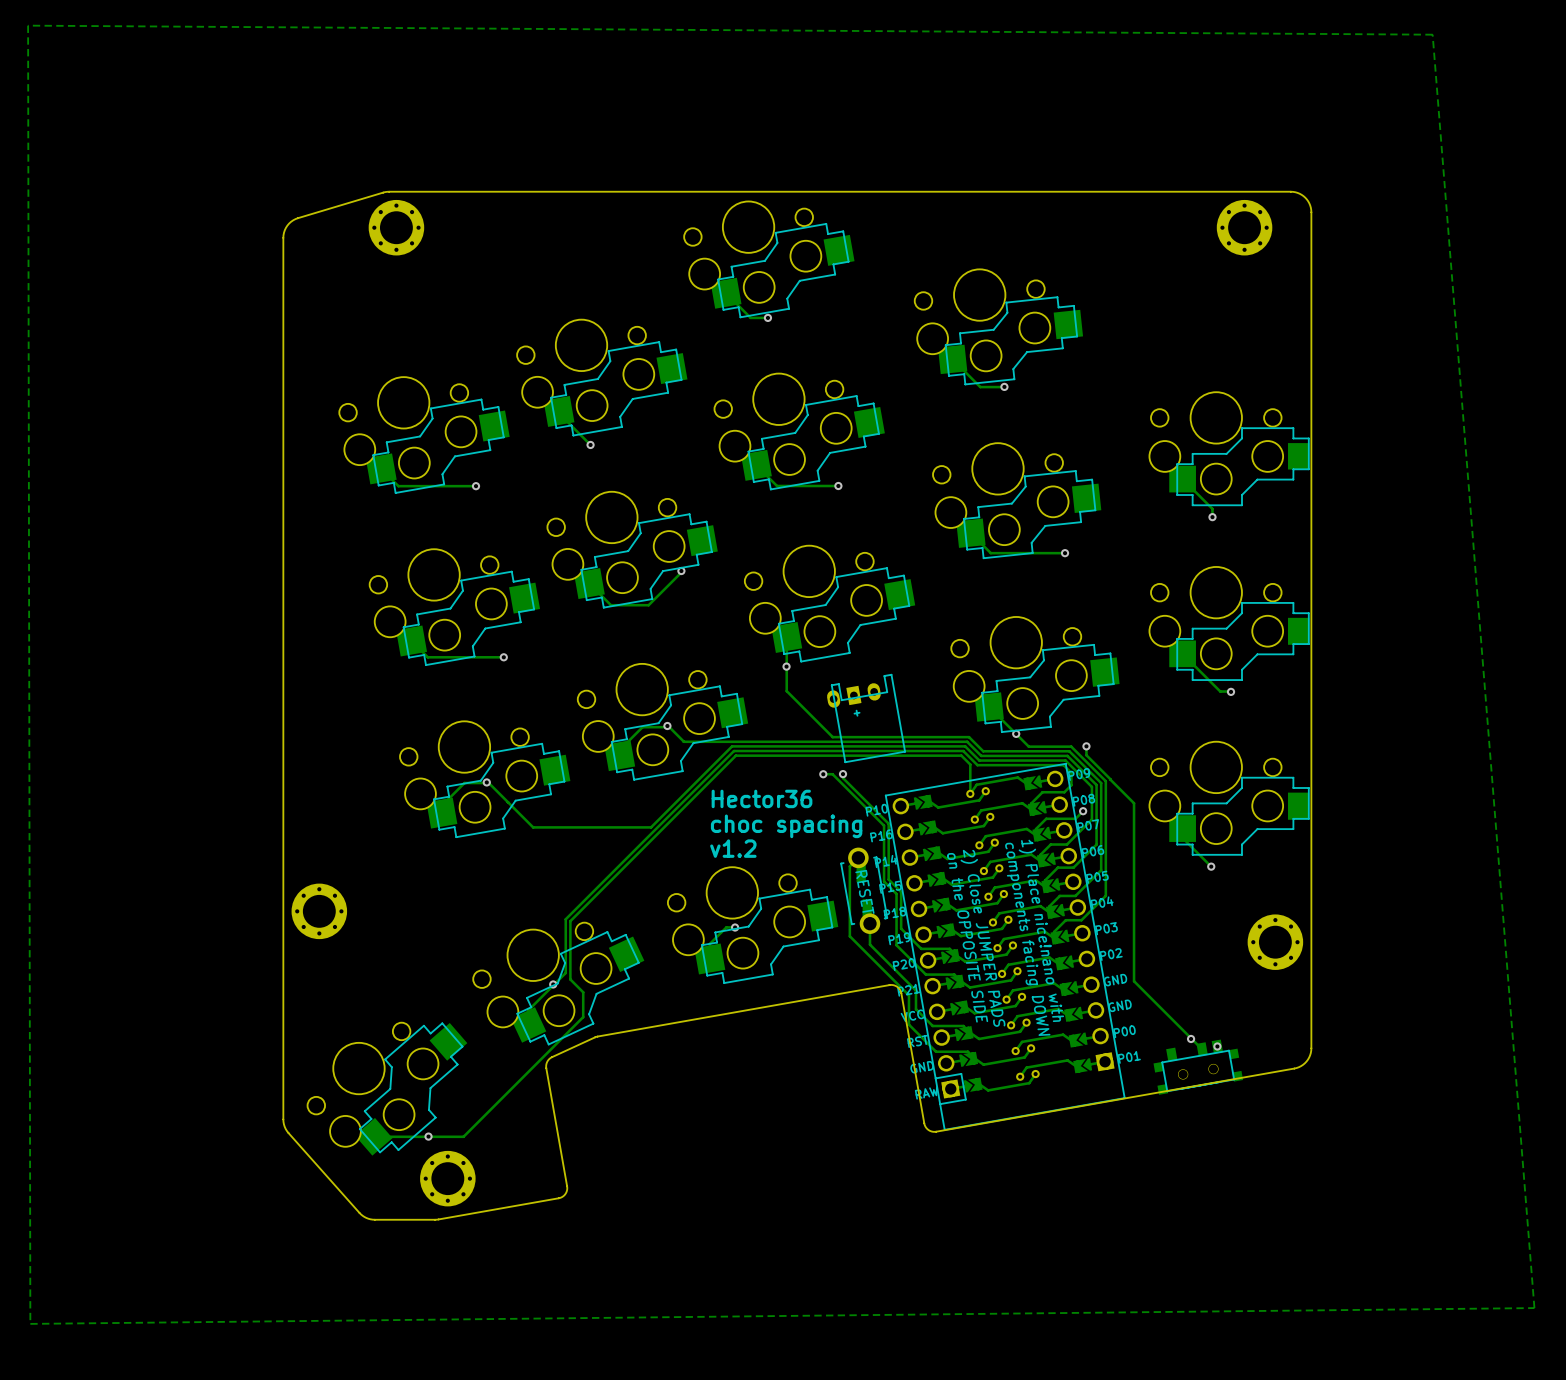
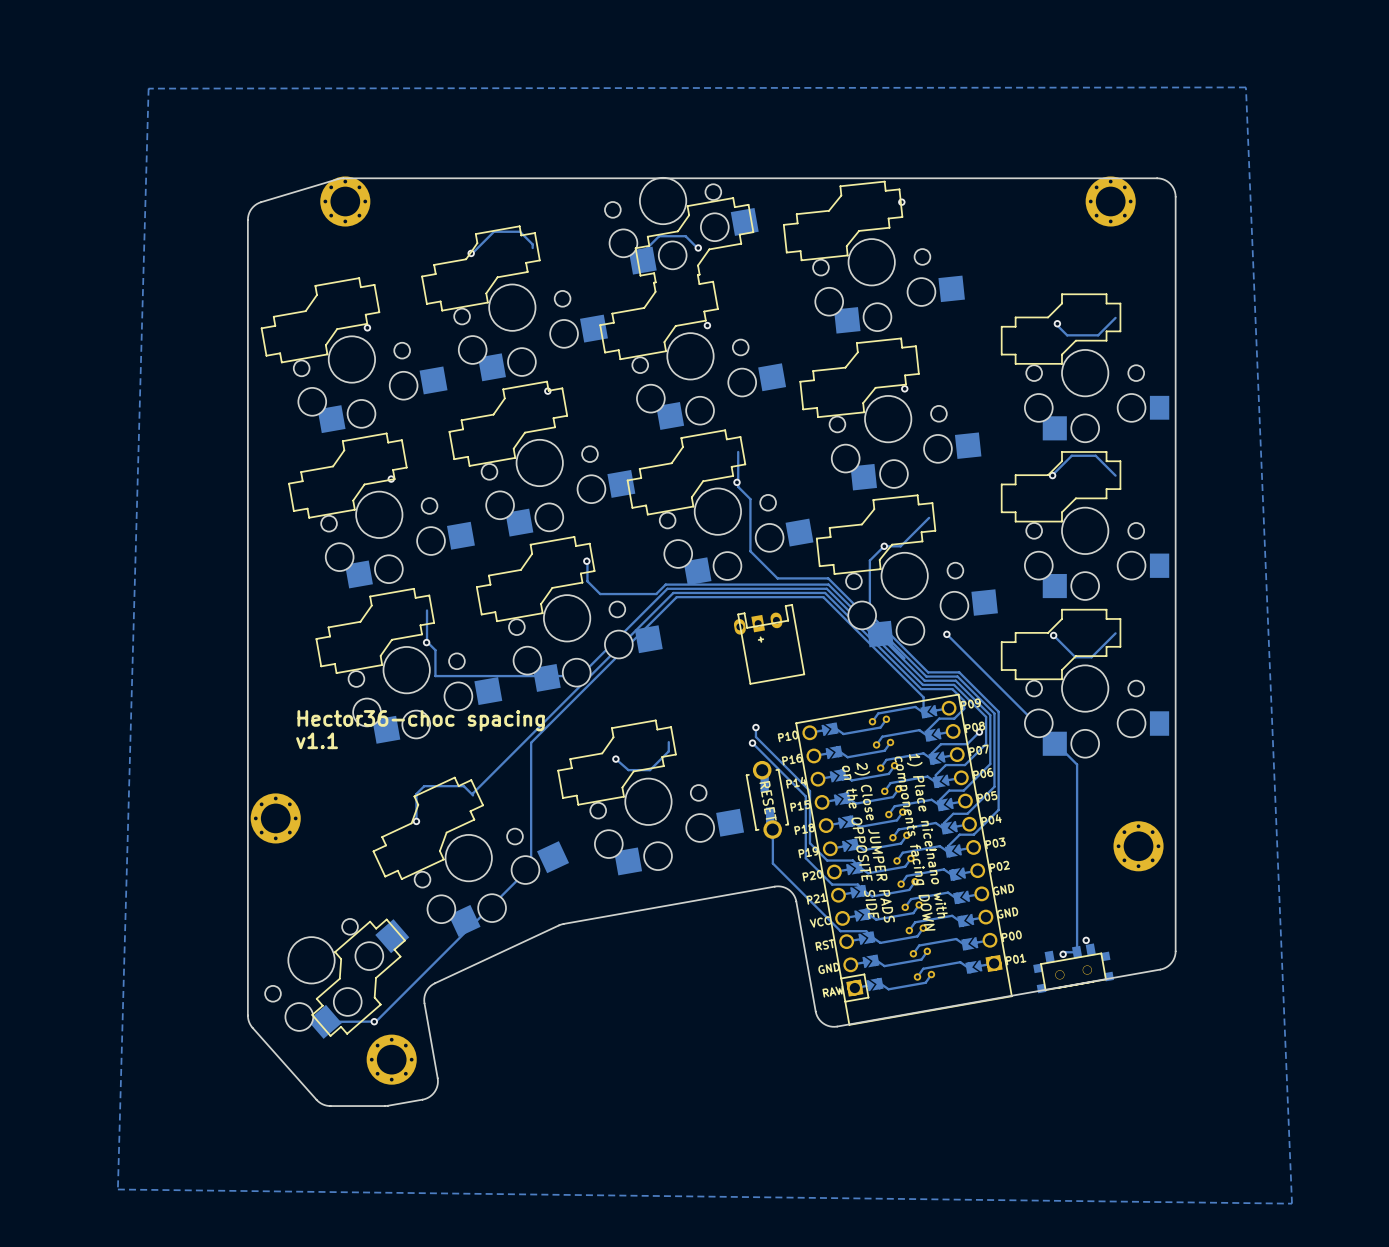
zone outline: (28, 25) (1432, 34) (1534, 1308) (30, 1323) (28, 25) -> (1245, 87) (1292, 1203) (117, 1189) (148, 88) (1245, 87)
board edge: (1290, 191) (389, 191) (298, 218) (289, 223) (283, 237) (283, 1121) (288, 1133) (360, 1214) (372, 1219) (436, 1219) (563, 1196) (566, 1192) (567, 1186) (546, 1064) (551, 1057) (595, 1037) (889, 985) (896, 986) (901, 992) (924, 1123) (926, 1128) (932, 1131) (1294, 1068) (1306, 1061) (1311, 1048) (1311, 212) (1310, 205) (1305, 197) (1297, 192) (1290, 191) -> (1157, 178) (1170, 183) (1175, 196) (1175, 951) (1171, 963) (1160, 969) (829, 1026) (821, 1021) (816, 1013) (795, 897) (786, 888) (774, 886) (561, 924) (434, 983) (427, 989) (424, 998) (437, 1080) (436, 1088) (431, 1095) (424, 1099) (386, 1105) (328, 1105) (317, 1101) (252, 1027) (248, 1017) (247, 219) (253, 207) (261, 202) (343, 178) (1157, 178)
line: none -> (884, 181) (840, 186) (841, 195) (828, 210) (796, 214) (797, 223) (783, 224) (786, 252) (800, 251) (801, 260) (847, 255) (846, 246) (859, 230) (889, 227) (888, 218) (902, 217) (899, 189) (885, 190) (884, 181)
via: none -> (901, 202)
line: none -> (519, 226) (475, 234) (477, 243) (466, 259) (434, 264) (435, 274) (422, 276) (426, 303) (440, 301) (442, 310) (487, 302) (486, 293) (497, 277) (527, 271) (526, 262) (539, 260) (534, 233) (521, 235) (519, 226)
track: none -> (532, 248) (532, 244) (520, 231) (493, 231) (472, 253)
via: none -> (698, 247)
via: none -> (471, 253)
track: (726, 293) (750, 317) (767, 317) -> (642, 260) (642, 252) (659, 236) (685, 236) (697, 247)
line: (787, 309) (740, 317) -> (697, 274) (699, 284) (713, 281) (717, 309) (704, 311) (705, 320) (675, 325) (664, 342) (666, 351) (620, 359) (618, 350) (605, 352) (602, 338)
line: none -> (359, 278) (315, 285) (316, 295) (305, 311) (273, 316) (275, 325) (261, 328) (266, 355) (280, 353) (281, 362) (327, 354) (325, 345) (337, 329) (367, 323) (365, 314) (379, 312) (374, 284) (360, 287) (359, 278)
line: none -> (655, 282) (653, 282) (655, 291) (644, 307) (612, 313) (613, 322) (600, 325)
via: (767, 317) -> none
line: none -> (1106, 294) (1106, 303) (1120, 303) (1120, 331) (1106, 331) (1106, 340) (1075, 340) (1061, 354) (1061, 363) (1015, 363) (1015, 354) (1001, 354) (1001, 326) (1015, 326) (1015, 317) (1048, 317) (1061, 303) (1061, 294) (1106, 294)
track: none -> (1115, 317) (1098, 335) (1067, 335) (1056, 325)
track: (952, 359) (980, 387) (1003, 387) -> none
via: none -> (1057, 323)
line: (678, 364) (676, 349) (661, 352) (659, 342) (608, 351) (610, 361) (597, 379) (564, 384) (566, 395) (551, 397) (556, 428) (571, 425) (573, 435) -> (547, 381) (548, 390) (562, 388) (567, 415) (553, 418) (555, 427) (524, 432) (513, 448) (515, 457) (469, 465) (467, 456) (454, 459) (449, 431) (463, 429) (461, 420) (493, 414) (504, 398) (503, 389) (505, 389)
via: none -> (707, 325)
via: none -> (367, 327)
line: (681, 379) (666, 382) (668, 392) (632, 398) (620, 416) (621, 426) (619, 427) -> none
line: (1012, 379) (1014, 379) (1013, 369) (1027, 352) (1062, 348) (1061, 338) (1077, 336) (1073, 305) (1058, 307) (1057, 297) (1006, 302) (1007, 312) (993, 329) (959, 333) (961, 343) (945, 345) (948, 375) (964, 374) (965, 384) -> (901, 338) (902, 347) (915, 346) (918, 373) (905, 375) (906, 384) (875, 387) (863, 403) (864, 412) (818, 417) (817, 407) (803, 409) (800, 381) (814, 380) (813, 371) (845, 367) (857, 352) (856, 343) (858, 342)
via position: (1004, 386) -> (904, 388)
track: (558, 411) (590, 444) -> none
via position: (590, 444) -> (547, 391)
track: (756, 465) (777, 485) (838, 485) -> none
track: (381, 468) (398, 486) (476, 486) -> none
track: (1182, 479) (1212, 508) (1212, 517) -> none
line: (817, 481) (819, 480) (817, 470) (830, 452) (865, 446) (863, 436) (878, 433) (873, 403) (858, 406) (856, 396) (806, 404) (807, 415) (795, 432) (761, 438) (763, 448) (748, 451) (753, 481) (769, 479) (770, 489) -> (725, 430) (726, 439) (740, 437) (745, 464) (731, 466) (733, 475) (703, 481) (691, 497) (693, 506) (647, 514) (646, 505) (632, 507) (630, 494)
line: (442, 484) (444, 484) (442, 474) (454, 456) (490, 450) (488, 440) (503, 437) (498, 406) (483, 409) (481, 399) (430, 408) (432, 418) (420, 436) (386, 442) (388, 452) (373, 455) (378, 485) (393, 482) (395, 492) -> (386, 433) (388, 442) (401, 440) (406, 467) (393, 470) (394, 479) (364, 484) (353, 500) (354, 509) (309, 517) (307, 508) (293, 511) (289, 483) (302, 481) (301, 472) (333, 466) (344, 450) (342, 441) (344, 440)
via position: (838, 485) -> (736, 482)
via position: (476, 486) -> (391, 479)
line: none -> (683, 437) (681, 438) (682, 447) (671, 463) (639, 468) (641, 478) (627, 480)
track: none -> (738, 452) (736, 482) (738, 486) (750, 499) (750, 551) (777, 578) (828, 578) (926, 676) (957, 676) (994, 713) (994, 786) (967, 813) (953, 813) (944, 823) (944, 828)
line: (1239, 505) (1241, 505) (1241, 495) (1257, 479) (1293, 479) (1293, 469) (1308, 469) (1308, 438) (1293, 438) (1293, 428) (1241, 428) (1241, 438) (1226, 453) (1192, 453) (1192, 464) (1177, 464) (1177, 495) (1192, 495) (1192, 505) -> (1106, 451) (1106, 461) (1120, 461) (1120, 489) (1106, 489) (1106, 498) (1075, 498) (1061, 512) (1061, 521) (1015, 521) (1015, 512) (1001, 512) (1001, 484) (1015, 484) (1015, 475) (1048, 475) (1061, 461) (1061, 451) (1063, 451)
via position: (1212, 517) -> (1052, 475)
track: none -> (1052, 474) (1071, 455) (1095, 455) (1115, 475)
track: (970, 533) (990, 553) (1065, 553) -> none
line: (709, 536) (706, 521) (691, 524) (689, 514) (638, 523) (640, 533) (628, 551) (594, 557) (596, 567) (581, 569) (586, 600) (601, 597) (603, 607) -> (574, 536) (576, 546) (589, 543) (594, 571) (580, 573) (582, 582) (552, 587) (541, 604) (542, 613) (496, 621) (495, 612) (481, 614) (476, 587) (490, 584) (488, 575) (520, 569) (532, 553) (530, 544) (532, 544)
line: (711, 552) (696, 554) (698, 564) (663, 571) (650, 588) (652, 599) (650, 599) -> none
line: (1030, 553) (1032, 553) (1031, 542) (1045, 525) (1081, 522) (1080, 511) (1095, 510) (1092, 479) (1076, 481) (1075, 471) (1024, 476) (1025, 486) (1011, 503) (978, 507) (979, 517) (963, 518) (967, 549) (982, 548) (983, 558) -> (917, 495) (918, 504) (932, 503) (935, 530) (921, 532) (922, 541) (892, 544) (879, 559) (880, 569) (834, 574) (833, 564) (819, 566) (816, 538) (830, 537) (829, 527) (861, 524) (874, 509) (873, 499) (875, 499)
via: (1065, 553) -> none
line: (886, 568) (888, 578) (903, 575) (909, 605) (894, 608) (895, 618) (860, 624) (847, 642) (849, 652) (801, 661) (799, 651) (784, 654) (778, 623) (794, 621) (792, 610) (825, 605) (838, 587) (836, 577) (886, 568) -> none
via: (681, 571) -> none
track: (681, 572) (648, 605) (610, 605) (589, 583) -> none
track: none -> (929, 517) (900, 546) (884, 546) (869, 560) (869, 614) (928, 672) (959, 672) (998, 711) (998, 809) (973, 834) (959, 834) (948, 846) (948, 851)
via: none -> (884, 546)
track: none -> (587, 558) (587, 581) (600, 594) (656, 594) (665, 584) (828, 584) (924, 680) (955, 680) (990, 715) (990, 764) (963, 790) (949, 790) (939, 799) (939, 805)
via: none -> (586, 561)
track: (786, 637) (786, 691) (832, 737) (969, 737) (983, 751) (1069, 751) (1101, 783) (1101, 870) (1075, 895) (1059, 895) (1049, 906) (1049, 912) -> none
track: (411, 641) (427, 657) (503, 657) -> none
line: (1094, 644) (1095, 655) (1110, 653) (1113, 684) (1098, 685) (1099, 695) (1063, 699) (1049, 716) (1050, 726) (1001, 732) (1000, 721) (985, 723) (982, 692) (997, 691) (996, 680) (1030, 677) (1043, 660) (1042, 650) (1094, 644) -> none
track: (1182, 653) (1220, 691) (1230, 691) -> none
line: (472, 656) (474, 656) (472, 646) (485, 628) (520, 622) (518, 612) (534, 609) (528, 579) (513, 581) (511, 571) (461, 580) (462, 590) (450, 608) (417, 614) (418, 624) (403, 627) (409, 657) (424, 654) (425, 665) -> (414, 588) (415, 597) (429, 595) (434, 622) (420, 625) (422, 634) (391, 639) (380, 655) (382, 665) (336, 673) (334, 663) (321, 666) (316, 638) (330, 636) (328, 627) (360, 621) (371, 605) (370, 596) (371, 596)
via: (503, 657) -> none
via: (786, 666) -> none
track: none -> (427, 610) (426, 642) (435, 650) (435, 676) (580, 676) (667, 588) (826, 588) (922, 684) (954, 684) (986, 716) (986, 743) (964, 765) (945, 765) (935, 775) (935, 782)
line: (1239, 680) (1241, 680) (1241, 669) (1257, 654) (1293, 654) (1293, 644) (1308, 644) (1308, 613) (1293, 613) (1293, 602) (1241, 602) (1241, 613) (1226, 628) (1192, 628) (1192, 638) (1177, 638) (1177, 669) (1192, 669) (1192, 680) -> (1106, 609) (1106, 618) (1120, 618) (1120, 646) (1106, 646) (1106, 656) (1075, 656) (1061, 670) (1061, 679) (1015, 679) (1015, 670) (1001, 670) (1001, 642) (1015, 642) (1015, 632) (1048, 632) (1061, 618) (1061, 609) (1063, 609)
line: (719, 686) (669, 695) (671, 705) (658, 723) (625, 729) (626, 739) (611, 741) (617, 772) (632, 769) (634, 779) (682, 771) (680, 761) (693, 743) (728, 736) (727, 726) (742, 724) (736, 693) (721, 696) (719, 686) -> none
via: (1231, 691) -> none
track: none -> (1115, 633) (1091, 657) (1075, 657) (1053, 635) (1055, 636)
track: none -> (946, 634) (1077, 764) (1077, 952) (1065, 952) (1063, 954)
via: none -> (946, 634)
via: none -> (1053, 635)
via: none -> (426, 642)
via: (667, 725) -> none
via: (1016, 733) -> none
track: (1016, 734) (1028, 746) (1071, 746) (1105, 781) (1105, 895) (1081, 920) (1065, 920) (1054, 931) (1054, 938) -> none
track: (683, 741) (667, 725) (642, 727) (619, 750) (619, 755) -> none
track: (683, 741) (967, 741) (981, 755) (1067, 755) (1096, 785) (1096, 844) (1073, 867) (1057, 867) (1045, 880) (1045, 886) -> none
line: (542, 743) (543, 753) (559, 751) (564, 781) (549, 784) (551, 794) (515, 800) (503, 818) (504, 828) (456, 837) (454, 827) (439, 829) (433, 799) (449, 796) (447, 786) (480, 780) (493, 762) (491, 752) (542, 743) -> none
track: (1086, 746) (1086, 755) (1134, 803) (1134, 981) (1202, 1049) -> none
via: (1086, 746) -> none
track: (823, 774) (832, 774) (884, 825) (884, 881) (896, 893) (896, 945) (906, 955) -> (752, 743) (805, 796) (805, 858)
via: (823, 774) -> none
track: (843, 774) (843, 778) (888, 823) (888, 879) (901, 892) (901, 928) (911, 938) -> (755, 727) (755, 737) (809, 791) (809, 843)
via: (843, 774) -> none
line: (1293, 777) (1293, 787) (1308, 787) (1308, 818) (1293, 818) (1293, 829) (1257, 829) (1241, 844) (1241, 854) (1192, 854) (1192, 844) (1177, 844) (1177, 813) (1192, 813) (1192, 803) (1226, 803) (1241, 787) (1241, 777) (1293, 777) -> none
via: (486, 782) -> none
track: (970, 793) (970, 764) (961, 755) (735, 755) (570, 921) (570, 979) (583, 992) (583, 1017) (463, 1136) (373, 1136) -> (923, 712) (923, 697) (823, 597) (676, 597) (531, 742) (531, 866) (375, 1021) (324, 1021)
text: Hector36 (762, 798) -> none
track: (507, 802) (488, 783) (464, 783) (441, 805) (441, 813) -> none
track: (508, 802) (533, 827) (651, 827) (732, 746) (965, 746) (979, 760) (1065, 760) (1091, 786) (1091, 819) (1066, 844) (1050, 844) (1040, 854) (1040, 861) -> none
line: none -> (655, 720) (611, 728) (613, 737) (602, 753) (570, 759) (571, 768) (558, 770) (563, 798) (576, 795) (578, 804) (624, 796) (622, 787) (633, 771) (663, 766) (662, 756) (675, 754) (671, 727) (657, 729) (655, 720)
text: none -> Hector36-choc spacing (421, 720)
track: (1031, 809) (1031, 803) (1042, 792) (1064, 792) (1071, 785) (1071, 772) (1063, 765) (977, 765) (963, 751) (733, 751) (565, 919) (565, 973) (528, 1010) (528, 1024) -> none
via: none -> (755, 727)
track: (1083, 811) (1075, 818) (1046, 818) (1035, 829) (1035, 835) -> none
via position: (1083, 811) -> (979, 732)
track: none -> (979, 732) (967, 744) (941, 744) (931, 753) (931, 759)
track: none -> (927, 735) (927, 730) (939, 718) (954, 718) (964, 708) (964, 700) (952, 689) (921, 689) (825, 592) (673, 592) (472, 795) (463, 786) (424, 786) (416, 794) (416, 821) (416, 819)
text: none -> v1.1 (317, 740)
track: none -> (668, 742) (668, 751) (650, 770) (628, 770) (617, 759)
text: choc spacing (786, 826) -> none
via: none -> (752, 743)
track: (1182, 828) (1182, 838) (1211, 866) -> none
via: none -> (615, 759)
text: v1.2 (733, 848) -> none
track: (858, 857) (849, 866) (849, 936) (908, 995) (908, 1024) (936, 1051) (967, 1051) (974, 1058) -> none
line: none -> (454, 777) (458, 786) (471, 780) (483, 805) (470, 811) (474, 819) (446, 832) (439, 851) (443, 859) (401, 879) (397, 870) (385, 876) (373, 851) (386, 845) (382, 837) (411, 823) (418, 804) (414, 796) (454, 777)
via: (1211, 866) -> none
line: (810, 889) (811, 899) (827, 897) (832, 927) (817, 930) (818, 940) (783, 946) (771, 964) (772, 974) (724, 983) (722, 972) (707, 975) (701, 945) (717, 942) (715, 932) (748, 926) (761, 908) (759, 898) (810, 889) -> none
via: none -> (416, 821)
track: (869, 923) (869, 944) (915, 990) (915, 1009) (932, 1026) (963, 1026) (969, 1032) -> none
track: (734, 927) (726, 927) (709, 943) (709, 958) -> none
via: (735, 927) -> none
line: (607, 932) (560, 953) (565, 963) (557, 983) (526, 997) (531, 1007) (517, 1013) (530, 1041) (544, 1035) (548, 1044) (593, 1023) (589, 1014) (596, 993) (629, 978) (624, 969) (638, 962) (625, 934) (611, 941) (607, 932) -> none
track: none -> (772, 838) (772, 863) (840, 931) (866, 931) (872, 937)
part position: (1005, 946) -> (904, 859)
track: (921, 948) (949, 948) (956, 955) -> (819, 852) (827, 860) (852, 860) (859, 867)
track: (925, 974) (954, 974) (960, 981) -> (823, 875) (832, 884) (857, 884) (864, 890)
via: (553, 984) -> none
via position: (1191, 1038) -> (1063, 954)
part: (1198, 1067) -> none
part: none -> (1073, 968)

